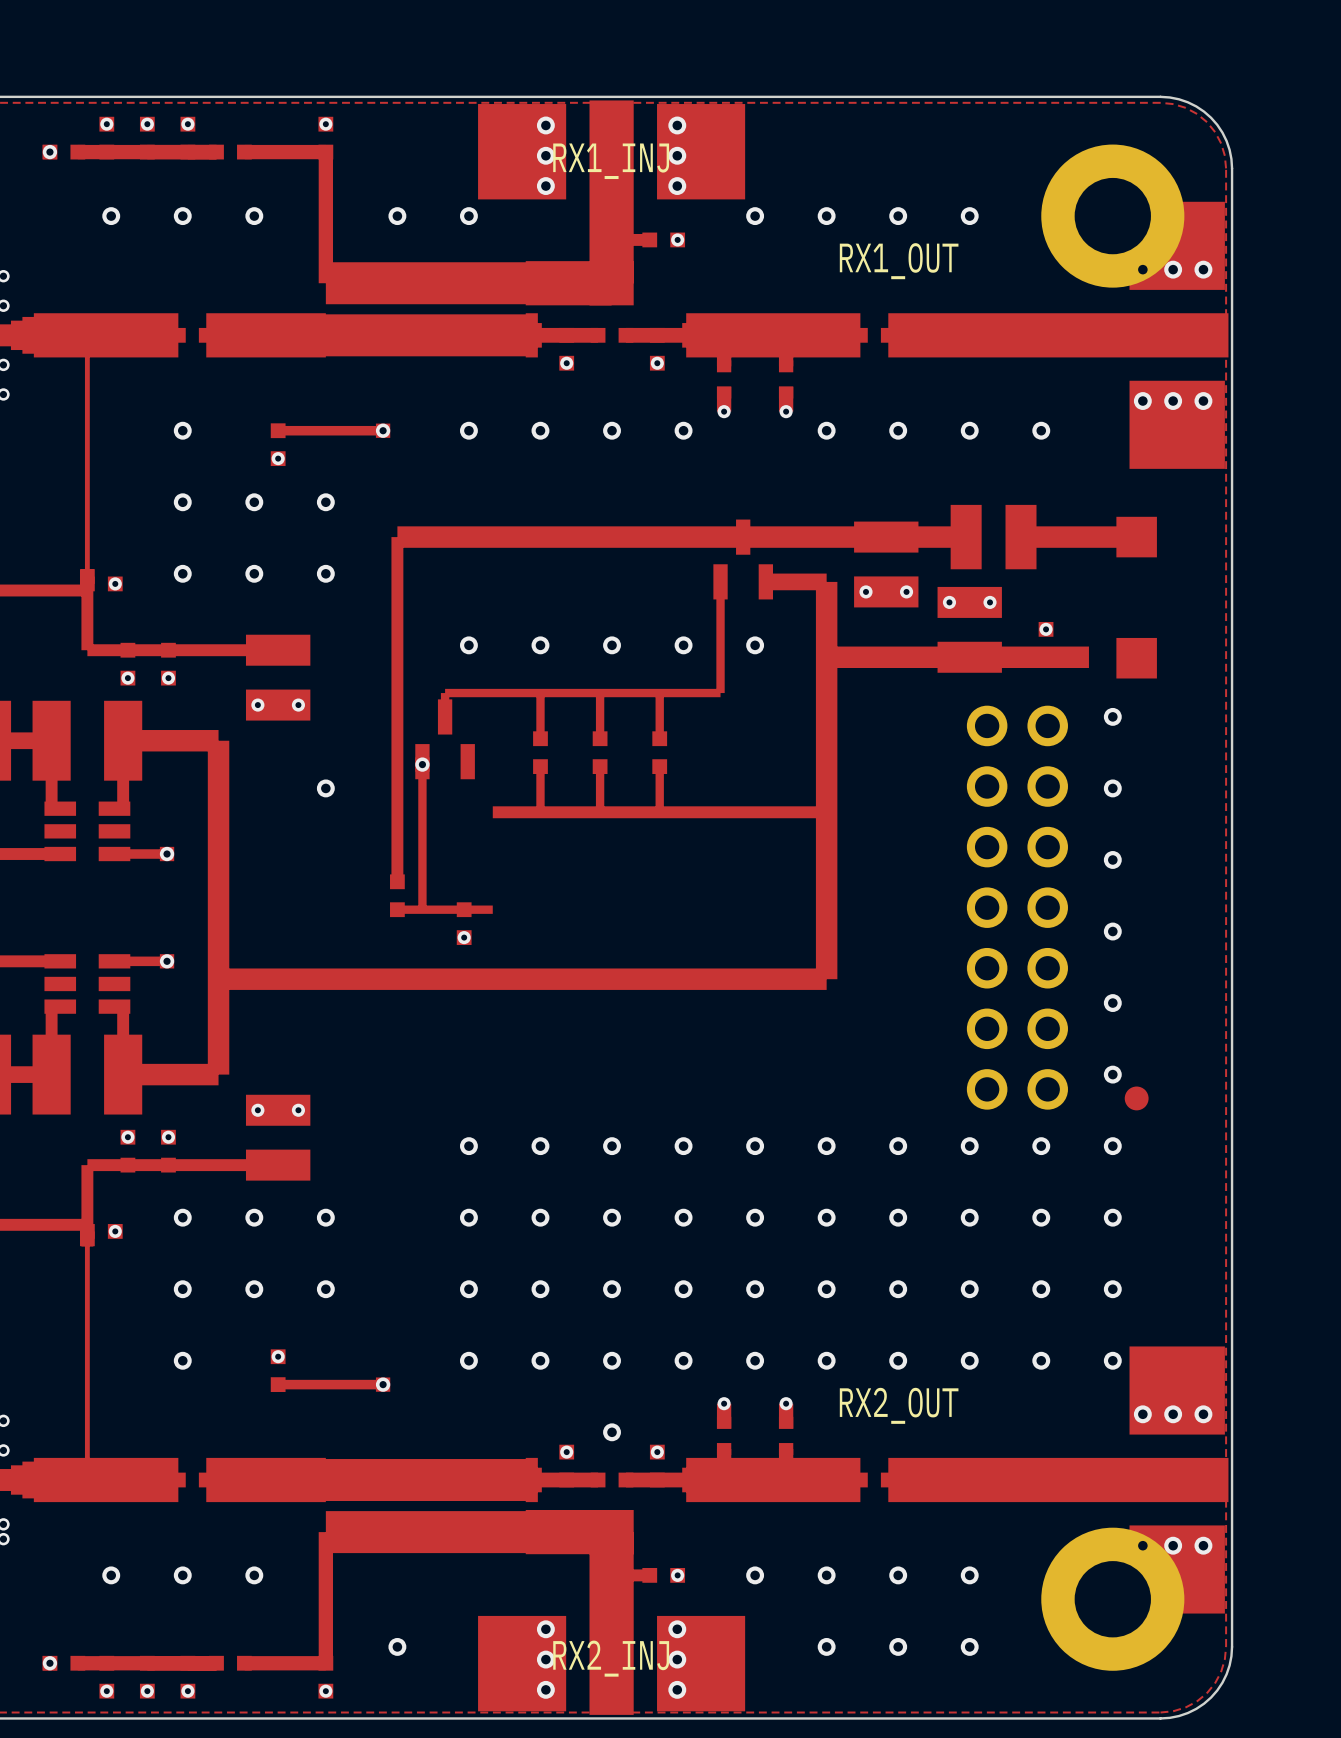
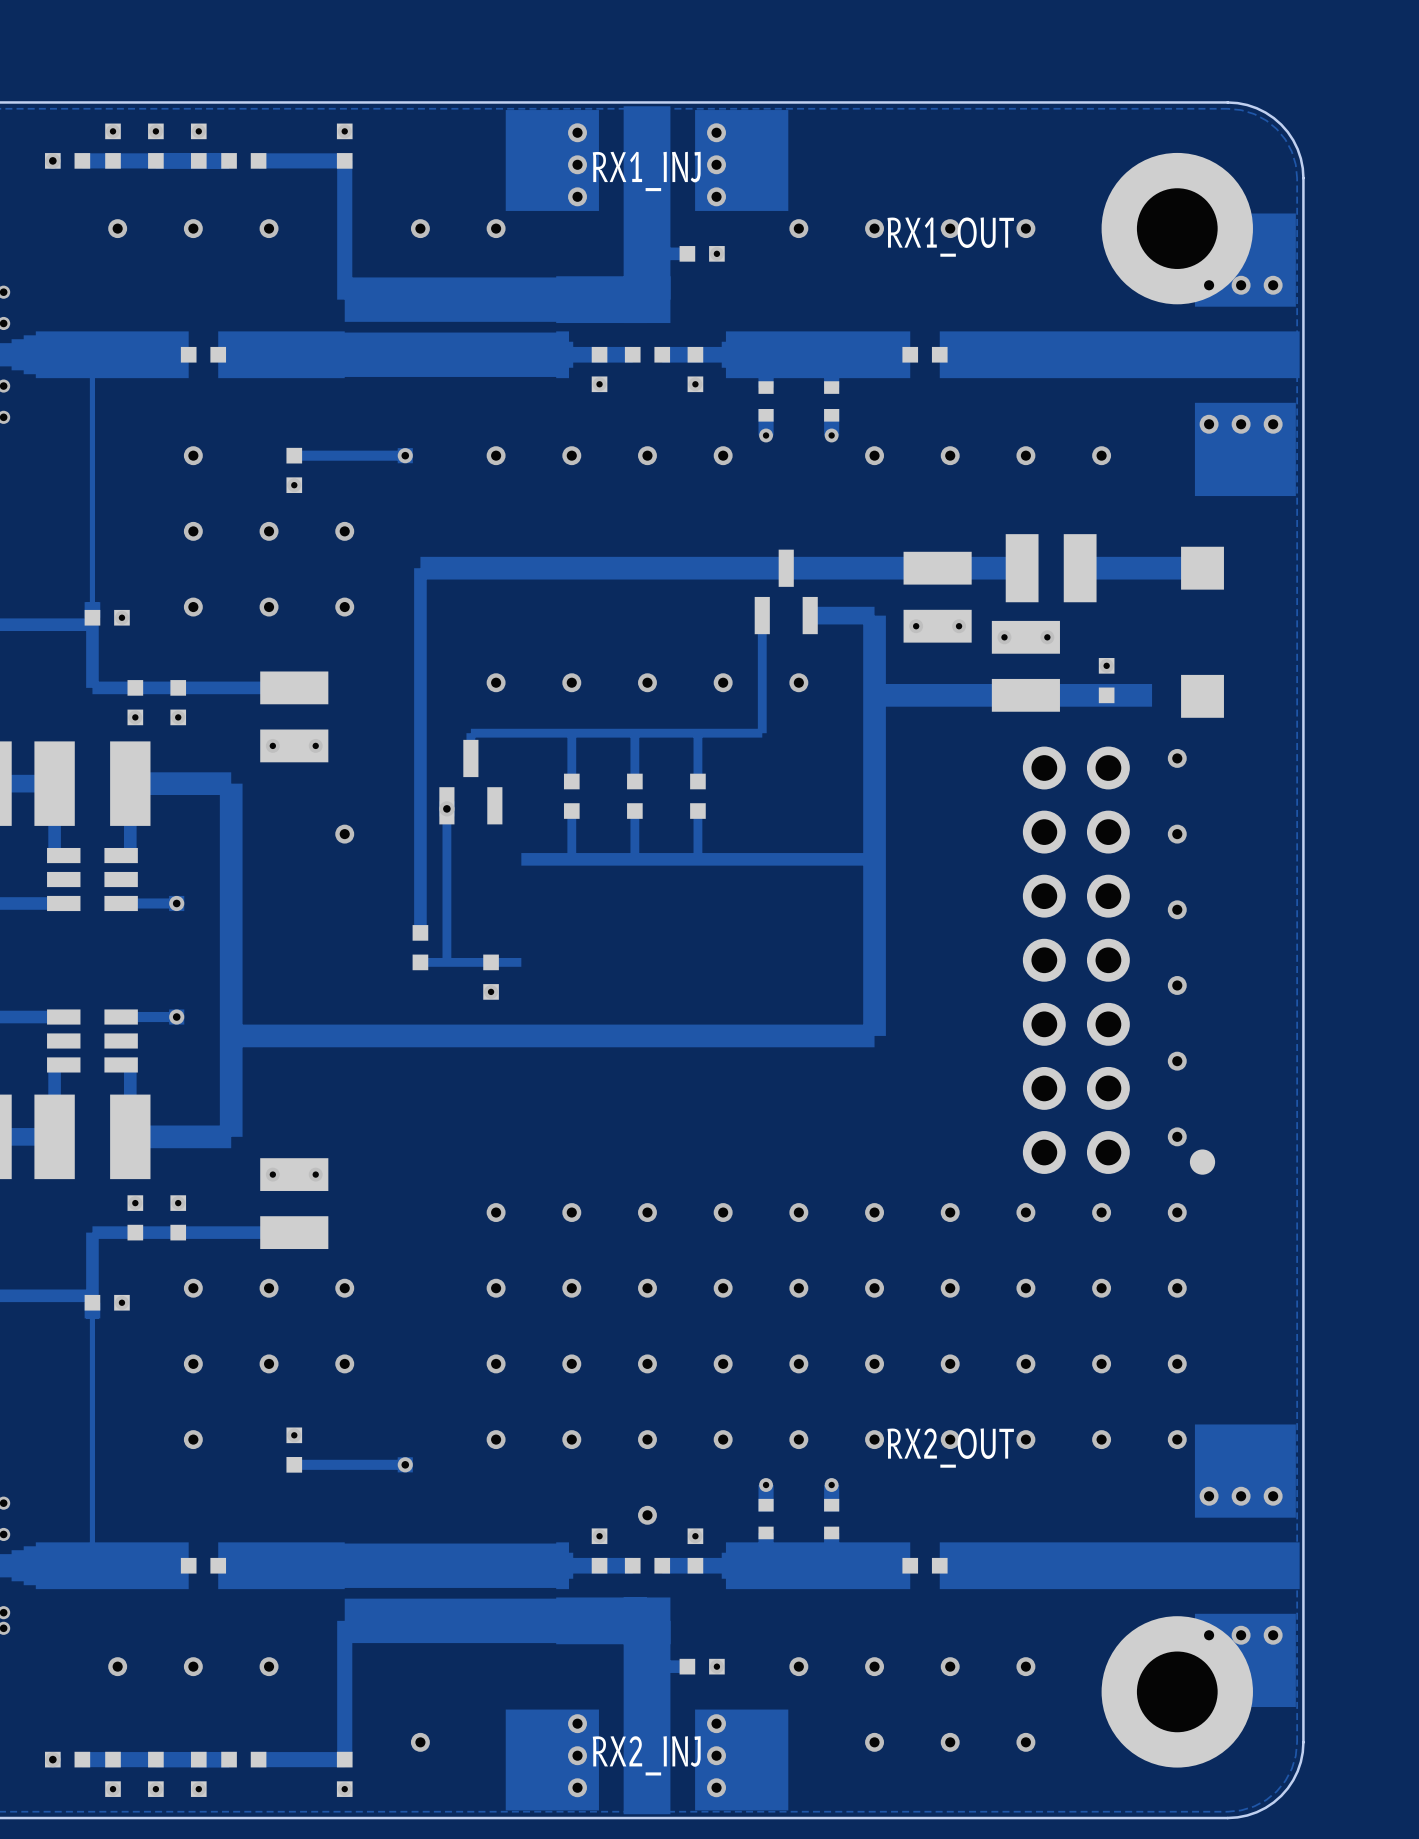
text position: RX1_OUT (899, 261) -> RX1_OUT (950, 237)
text position: RX2_OUT (899, 1405) -> RX2_OUT (950, 1448)

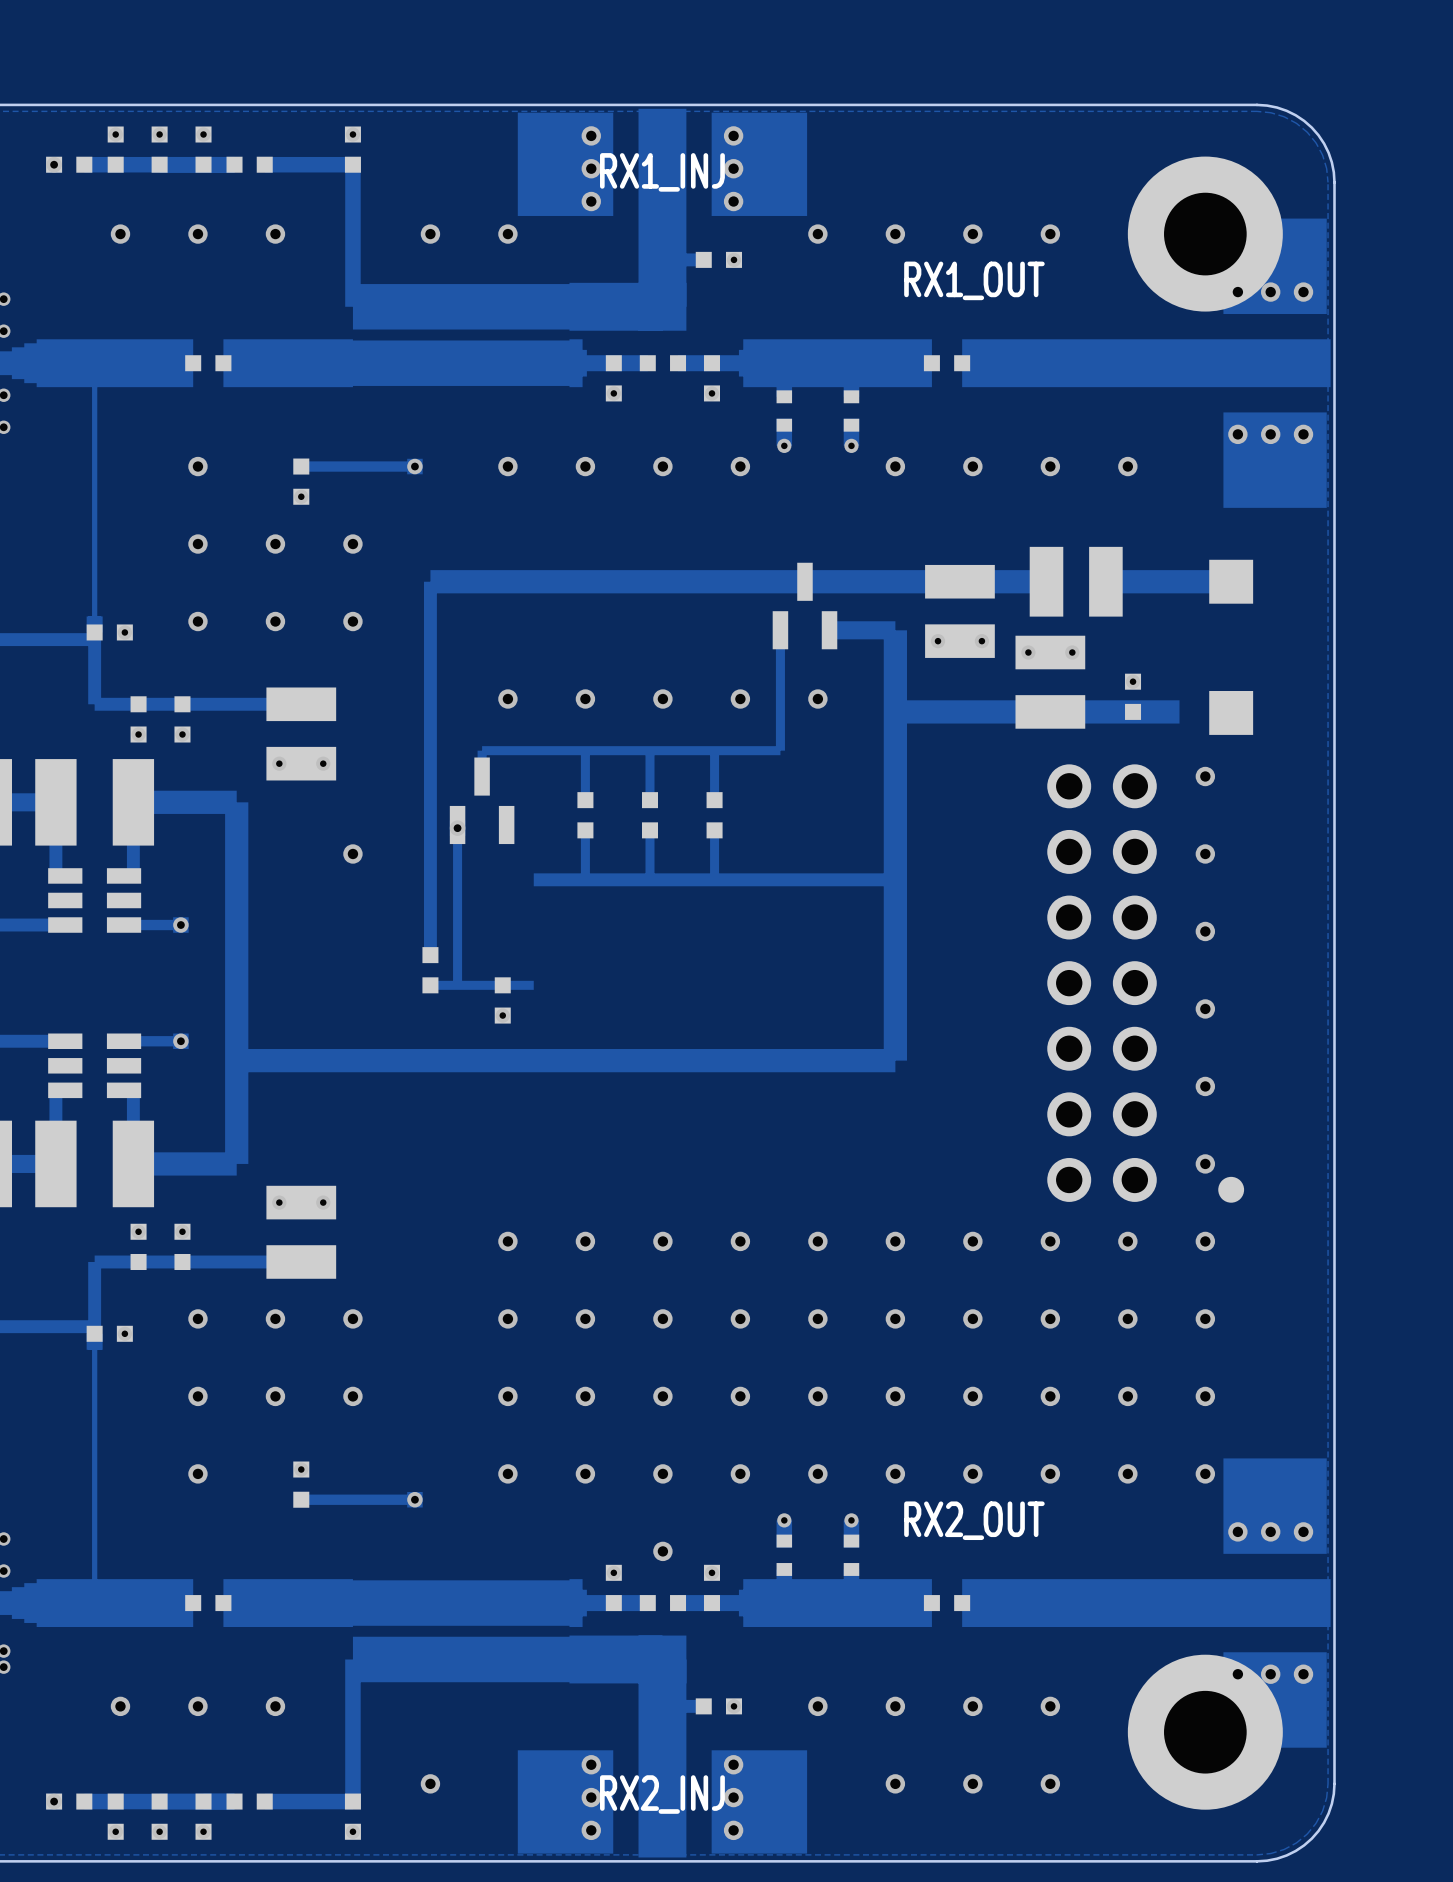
text position: RX1_OUT (950, 237) -> RX1_OUT (974, 280)
text position: RX2_OUT (950, 1448) -> RX2_OUT (974, 1520)

